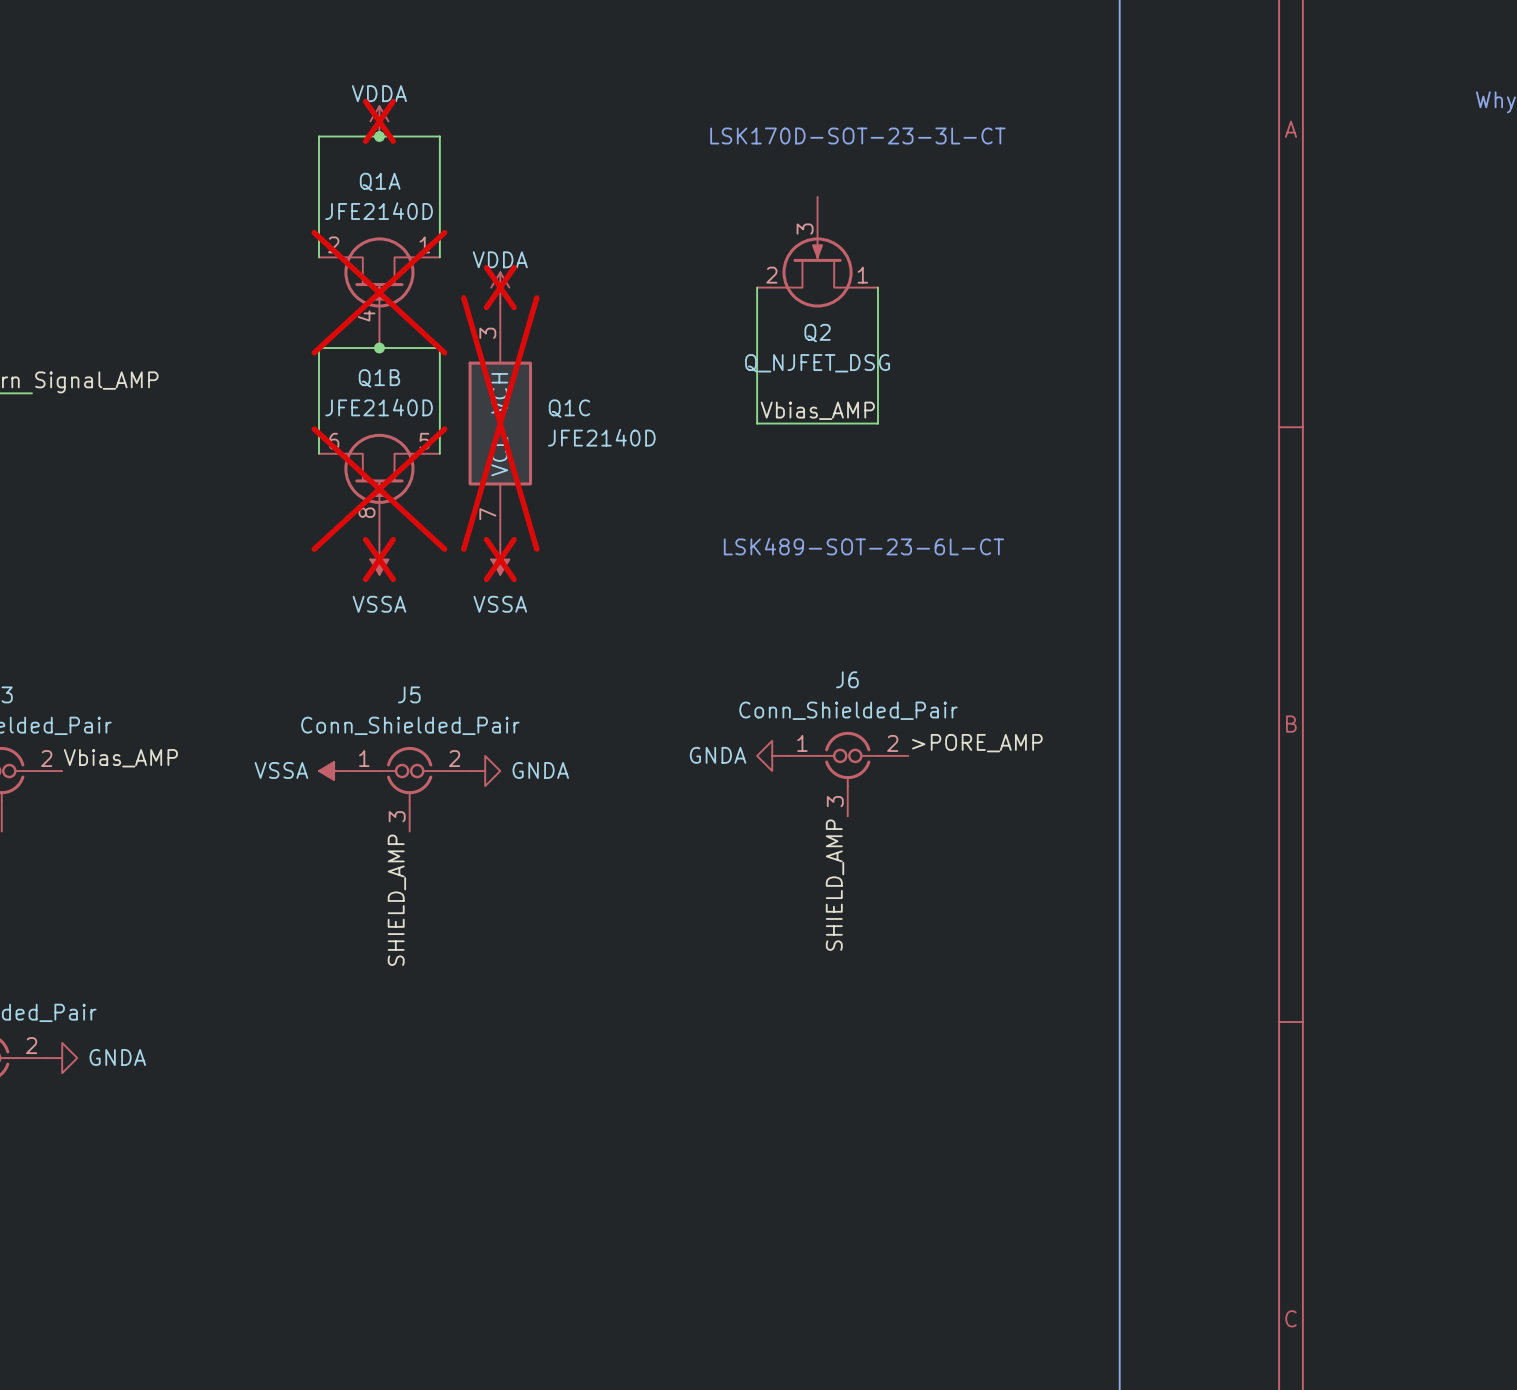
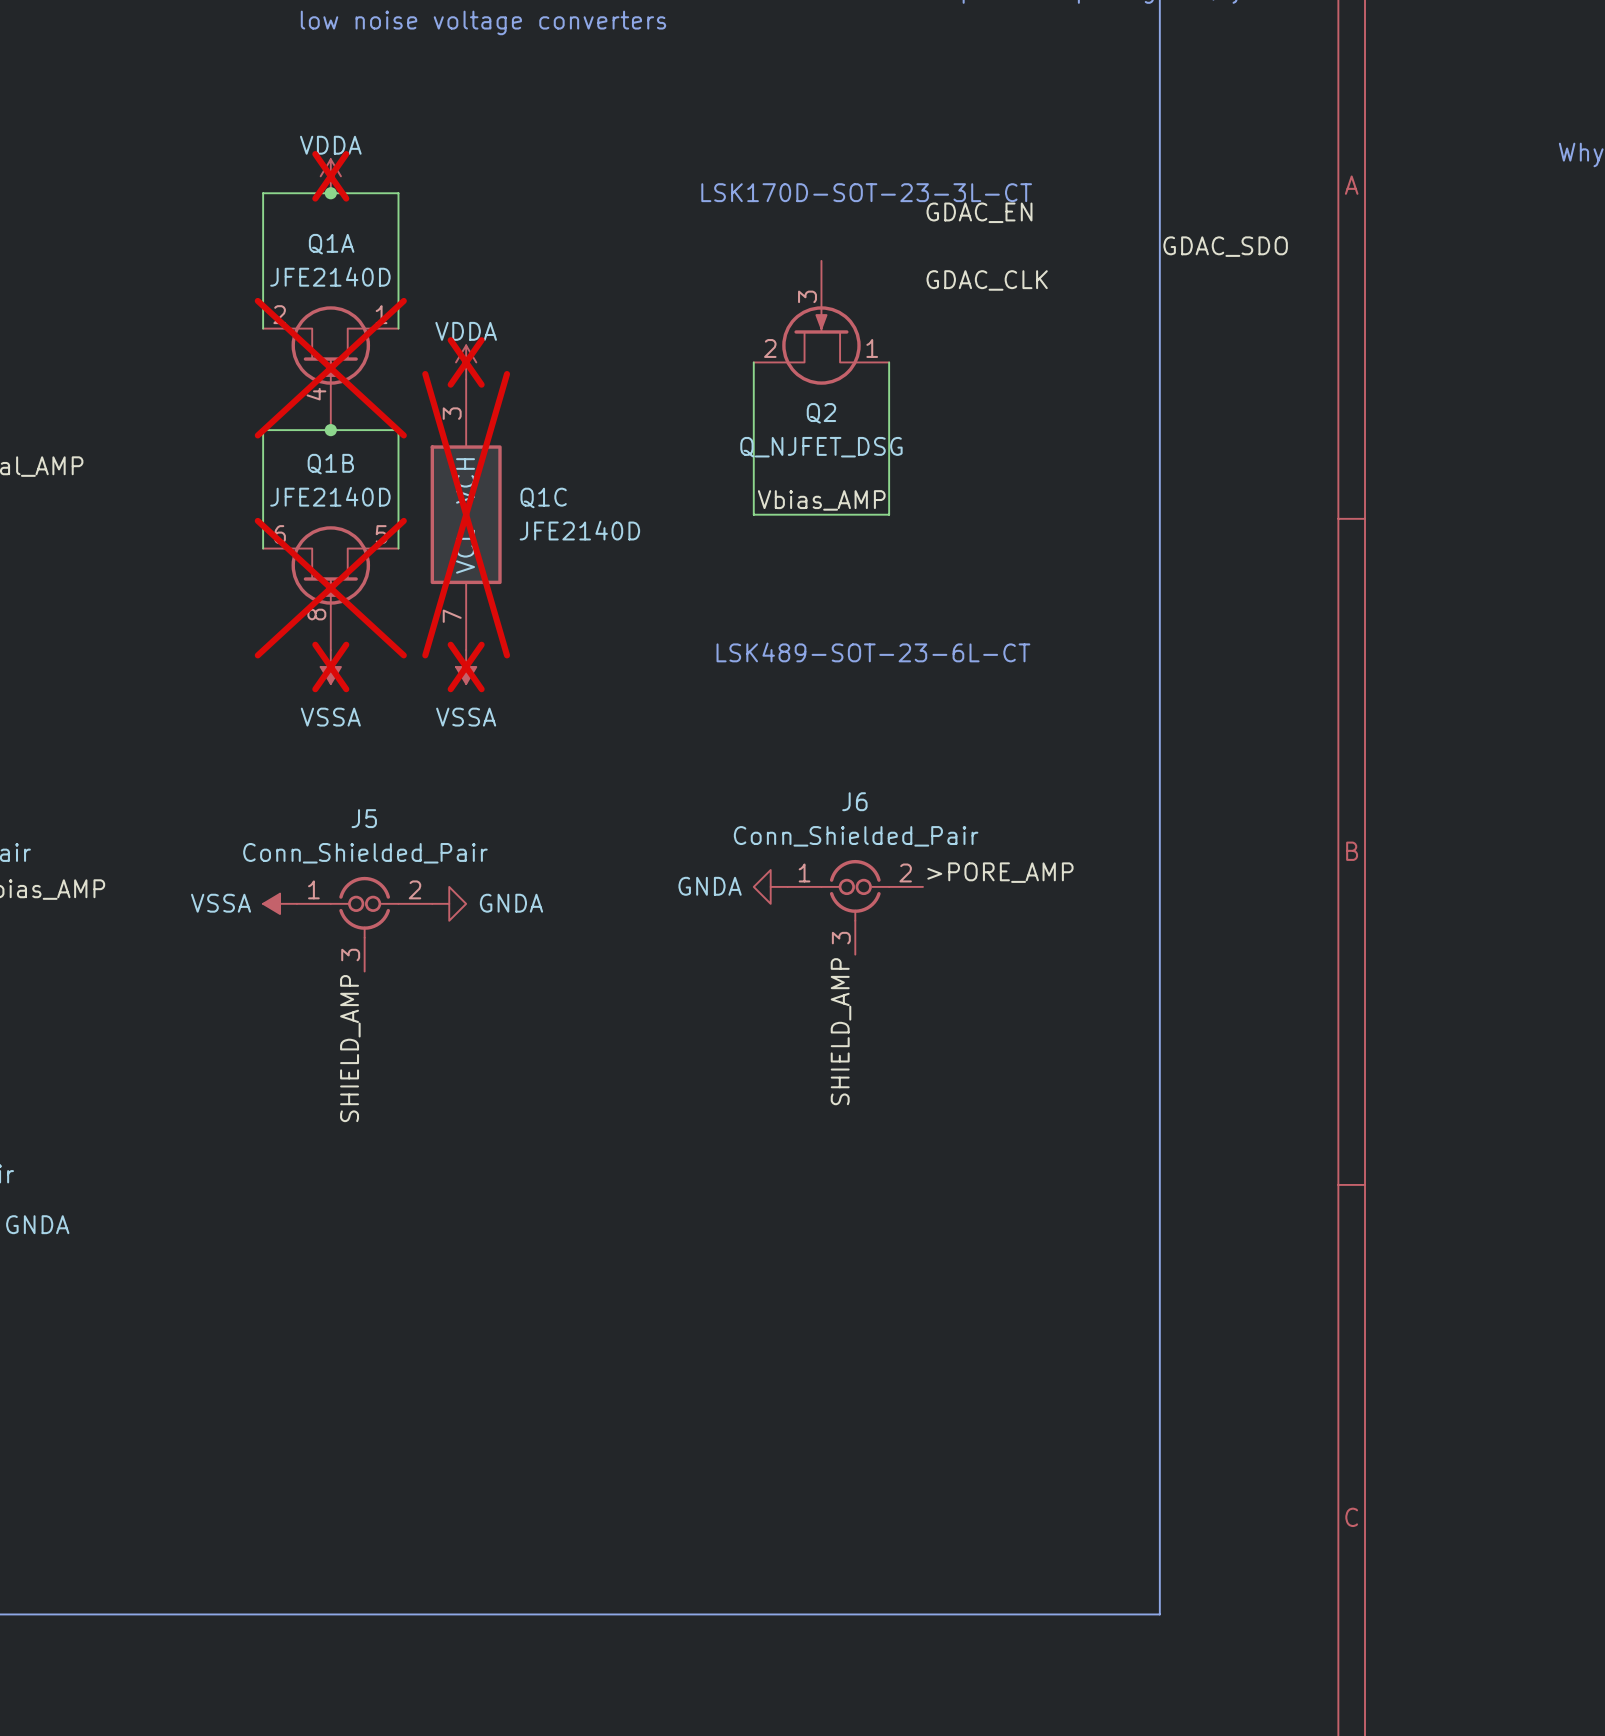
label: none -> GDAC_EN (979, 212)
label: none -> GDAC_SDO (1225, 246)
label: none -> GDAC_CLK (987, 280)

